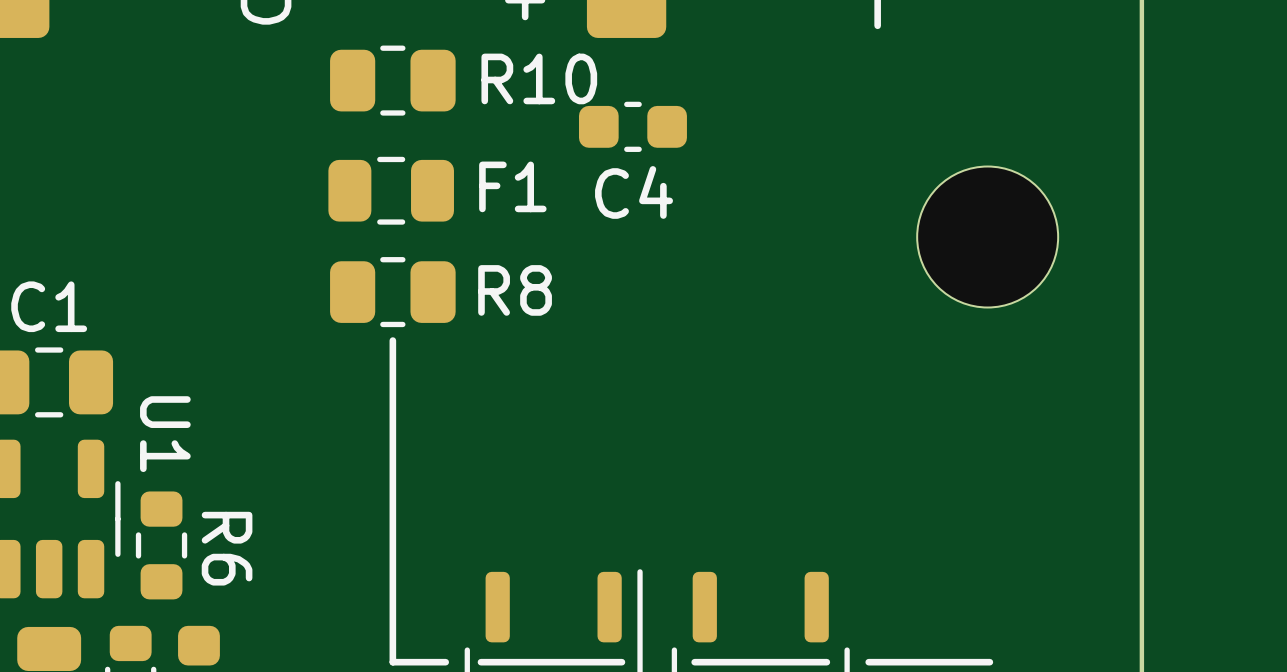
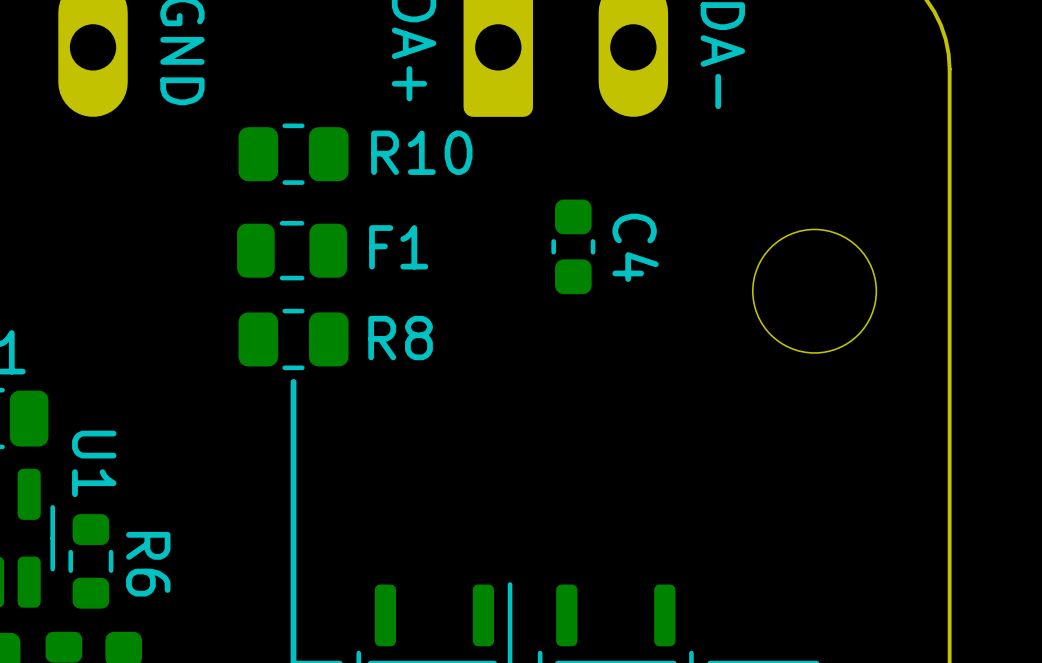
C4 rotation: 0° (632, 126) -> 90° clockwise (573, 246)
C4 position: (632, 126) -> (573, 246)
C4 name position: C4 (634, 192) -> C4 (635, 247)

